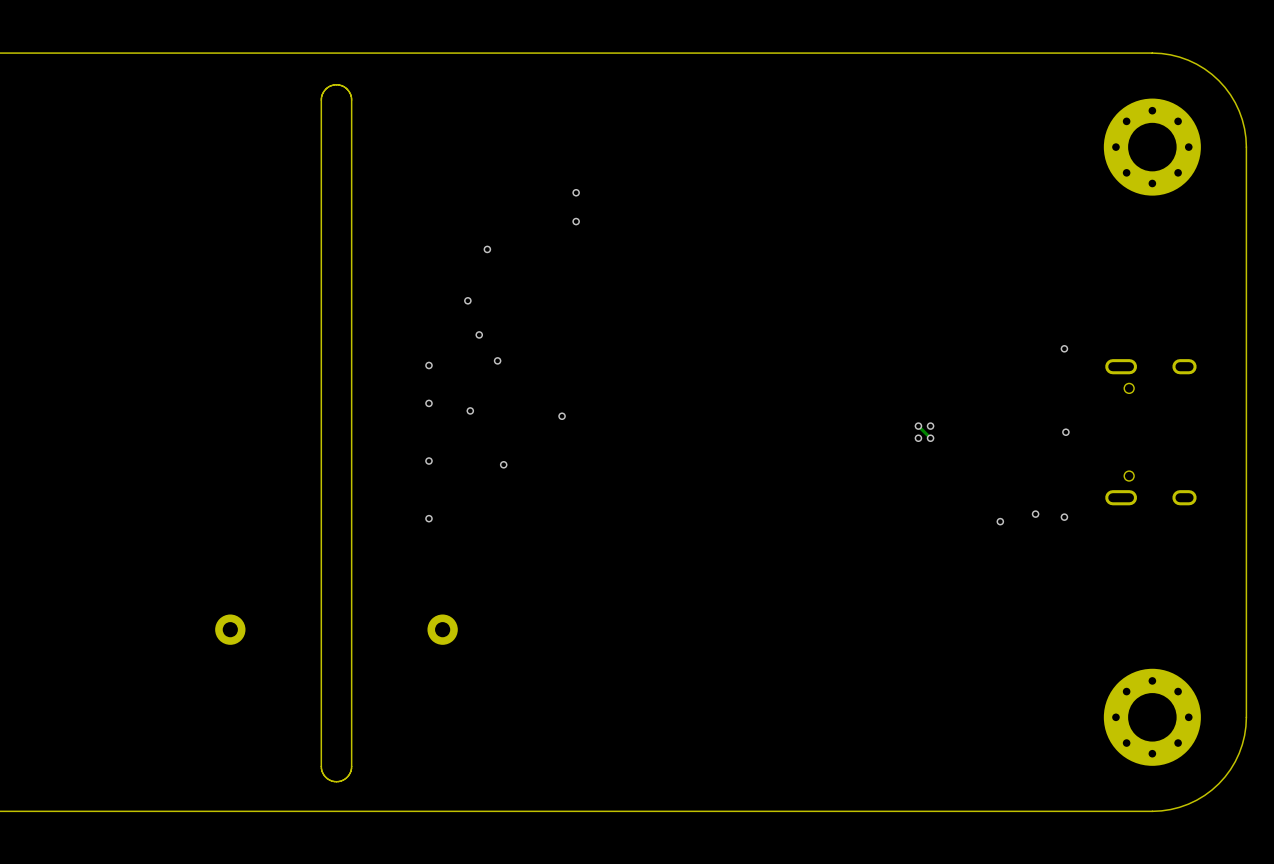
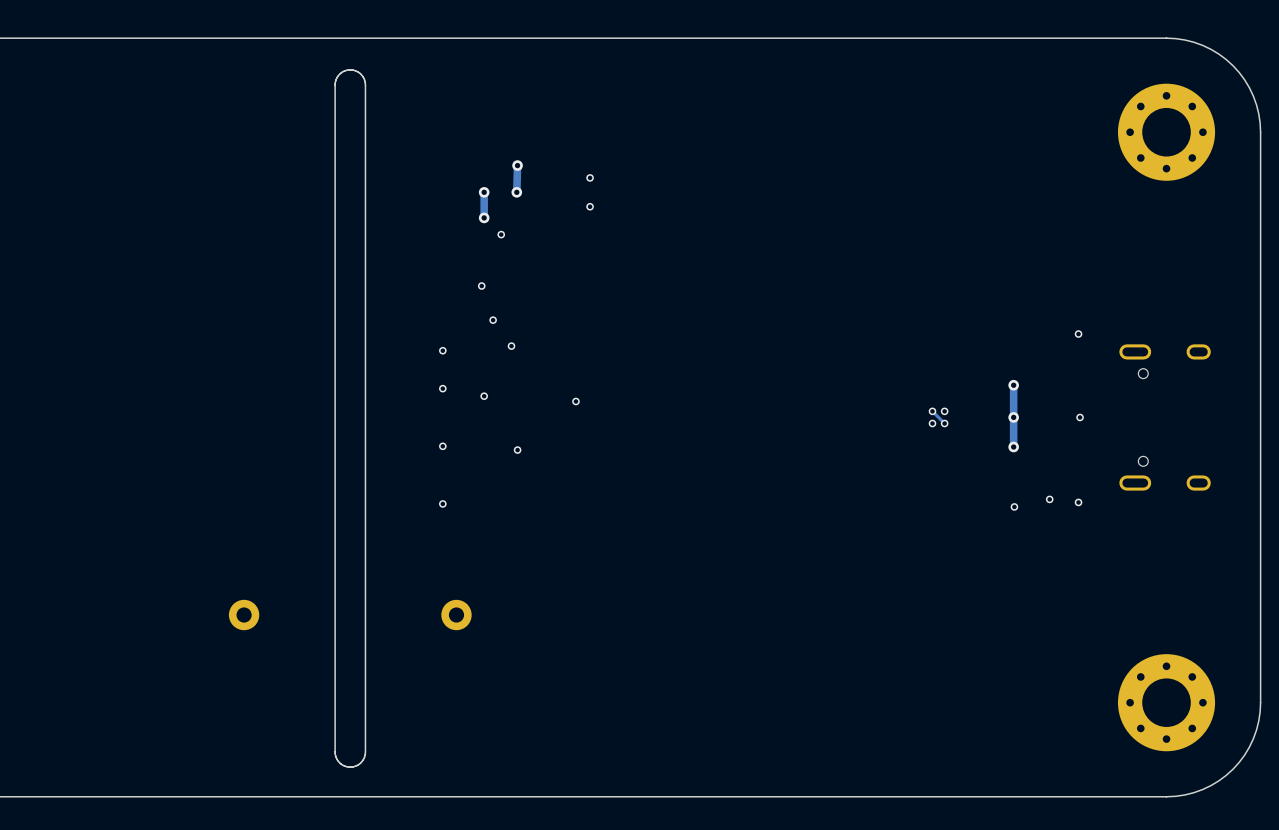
track: none -> (517, 165) (516, 192)
via: none -> (517, 165)
track: none -> (484, 192) (484, 217)
via: none -> (484, 192)
via: none -> (516, 192)
via: none -> (484, 217)
track: none -> (1013, 385) (1013, 447)
via: none -> (1013, 385)
via: none -> (1013, 417)
via: none -> (1013, 447)

